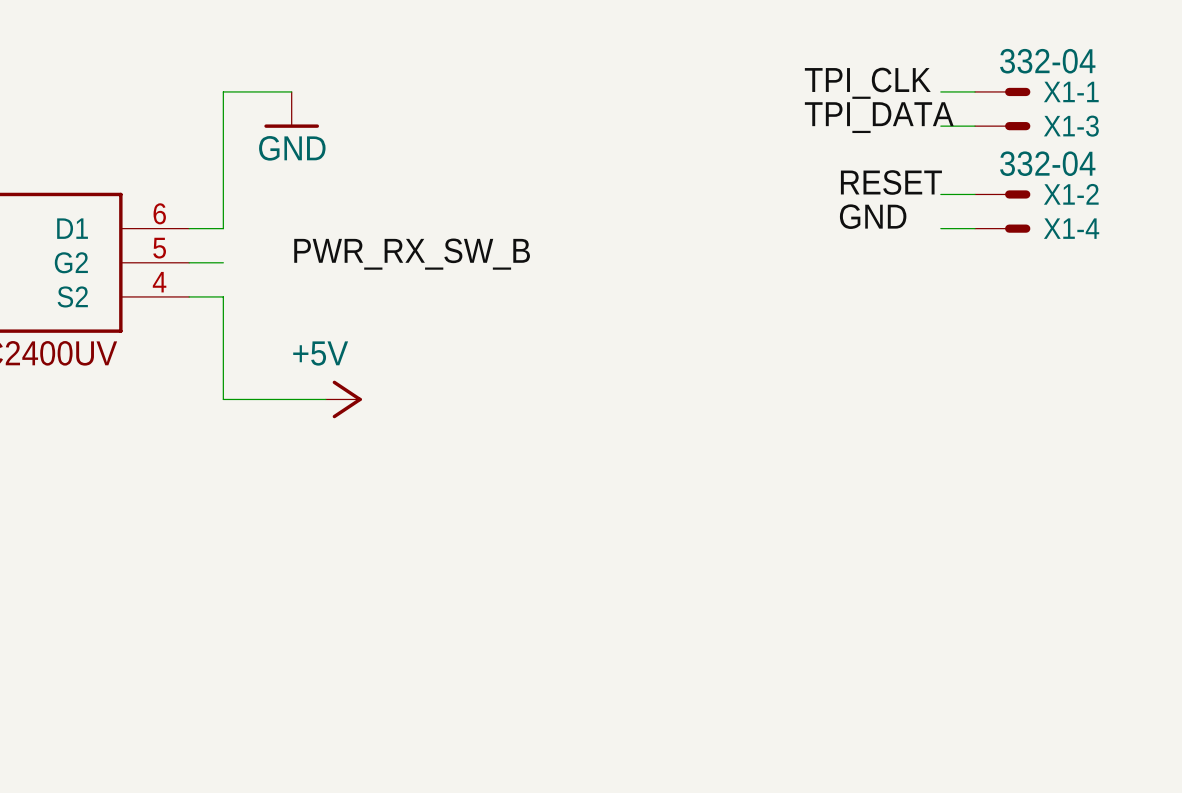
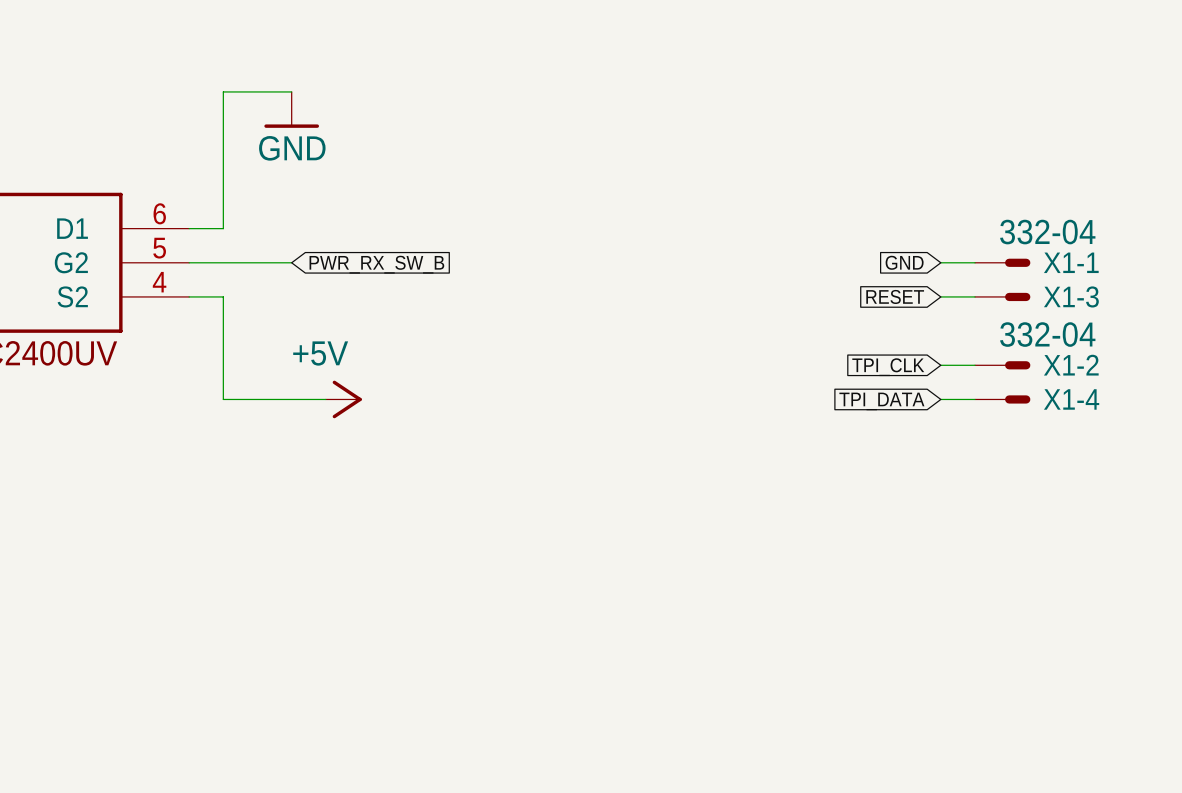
label: TPI_CLK (867, 83) -> none
wire: (940, 91) (975, 91) -> (940, 262) (975, 262)
X1-1 position: (1002, 91) -> (1002, 262)
label: TPI_DATA (879, 117) -> none
wire: (940, 126) (975, 126) -> (940, 296) (975, 296)
X1-3 position: (1002, 126) -> (1002, 296)
label: RESET (891, 182) -> none
wire: (940, 194) (975, 194) -> (940, 365) (975, 365)
X1-2 position: (1002, 194) -> (1002, 365)
label: GND (873, 216) -> none
wire: (940, 228) (975, 228) -> (940, 399) (975, 399)
X1-4 position: (1002, 228) -> (1002, 399)
label: PWR_RX_SW_B (412, 254) -> none
wire: none -> (223, 262) (291, 262)
global label: none -> GND (904, 262)
global label: none -> PWR_RX_SW_B (376, 264)
global label: none -> RESET (895, 296)
global label: none -> TPI_CLK (888, 367)
global label: none -> TPI_DATA (881, 401)

